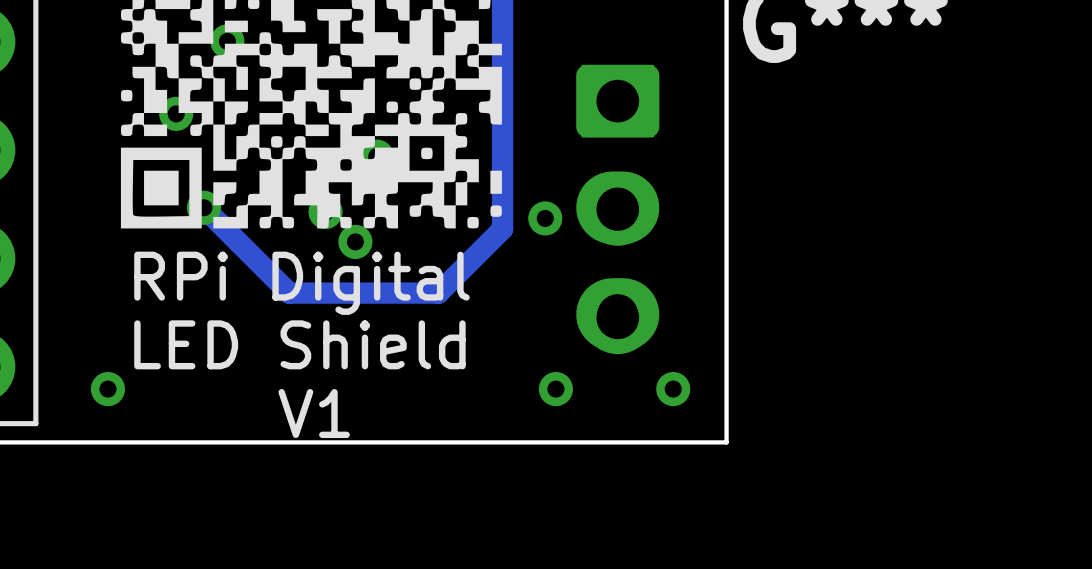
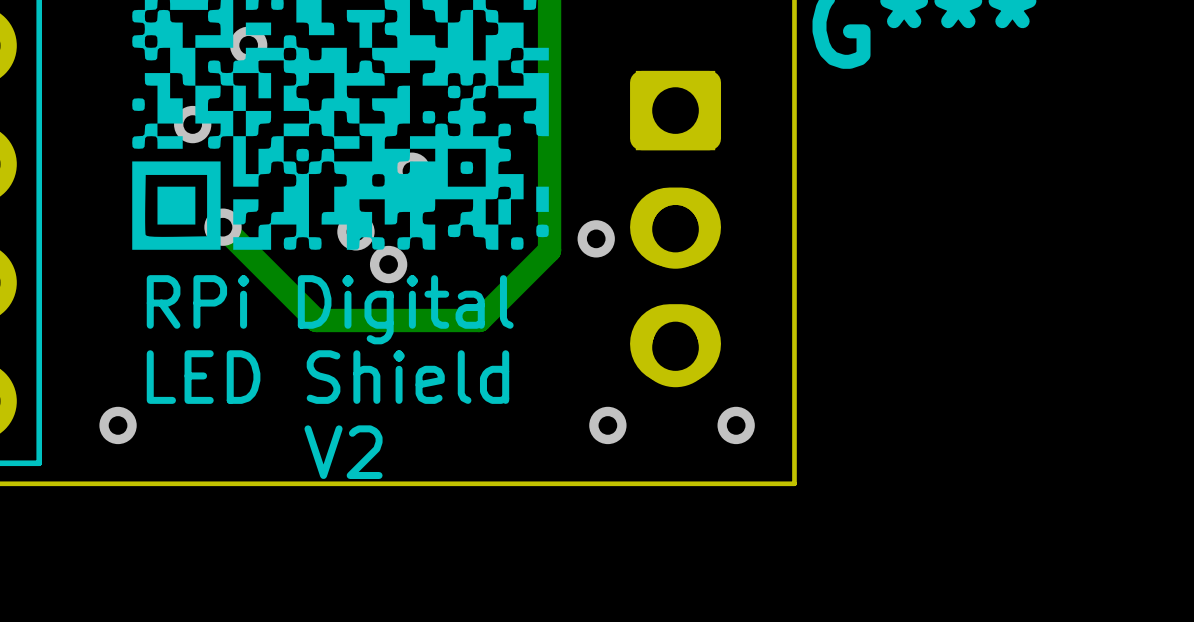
text: V1 (314, 413) -> V2 (343, 452)

